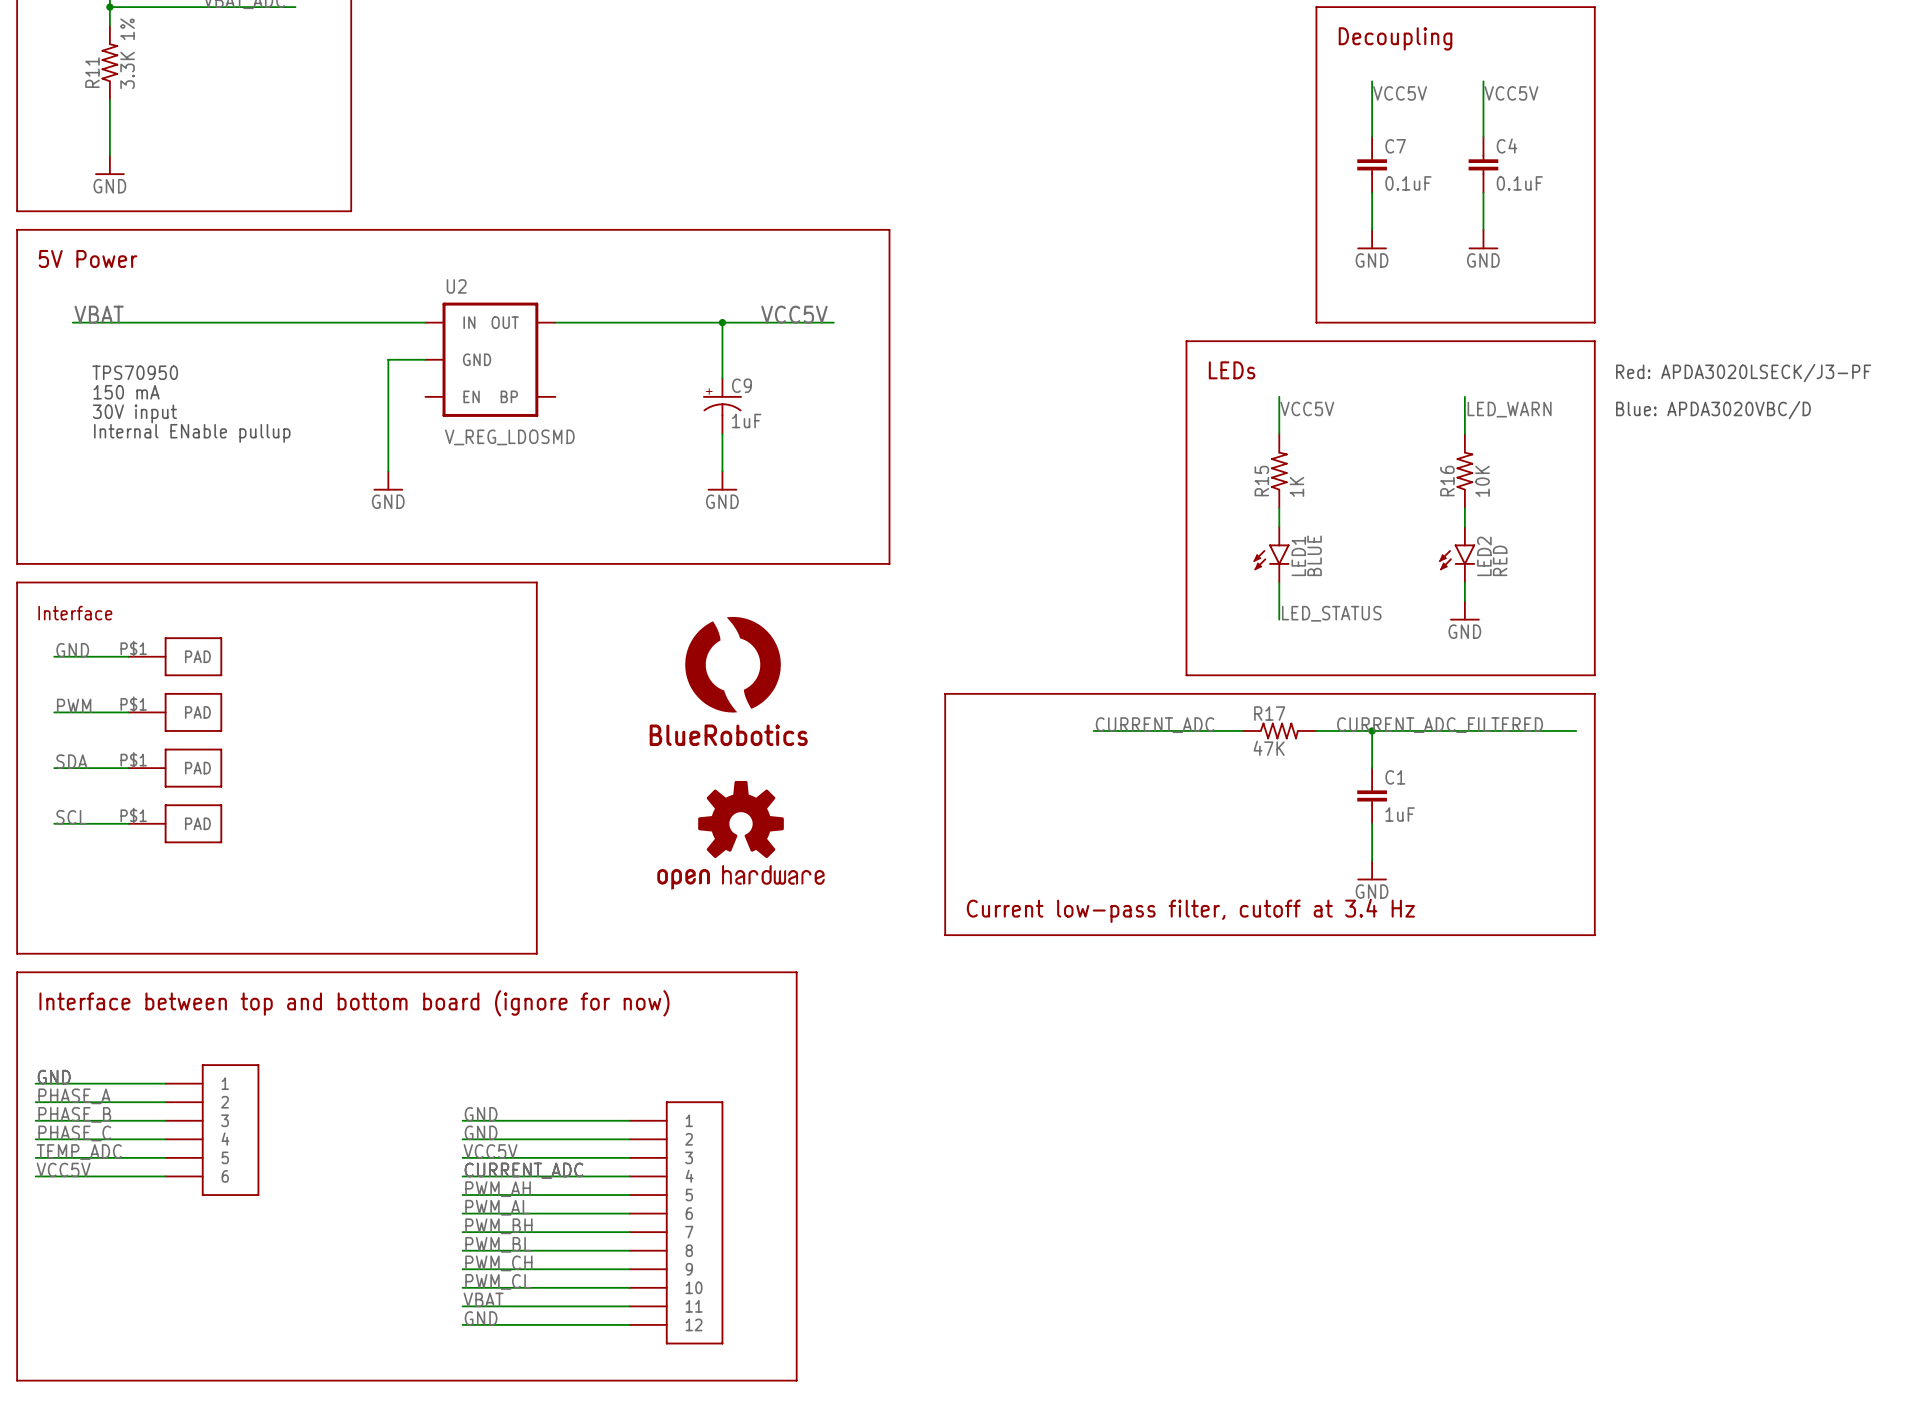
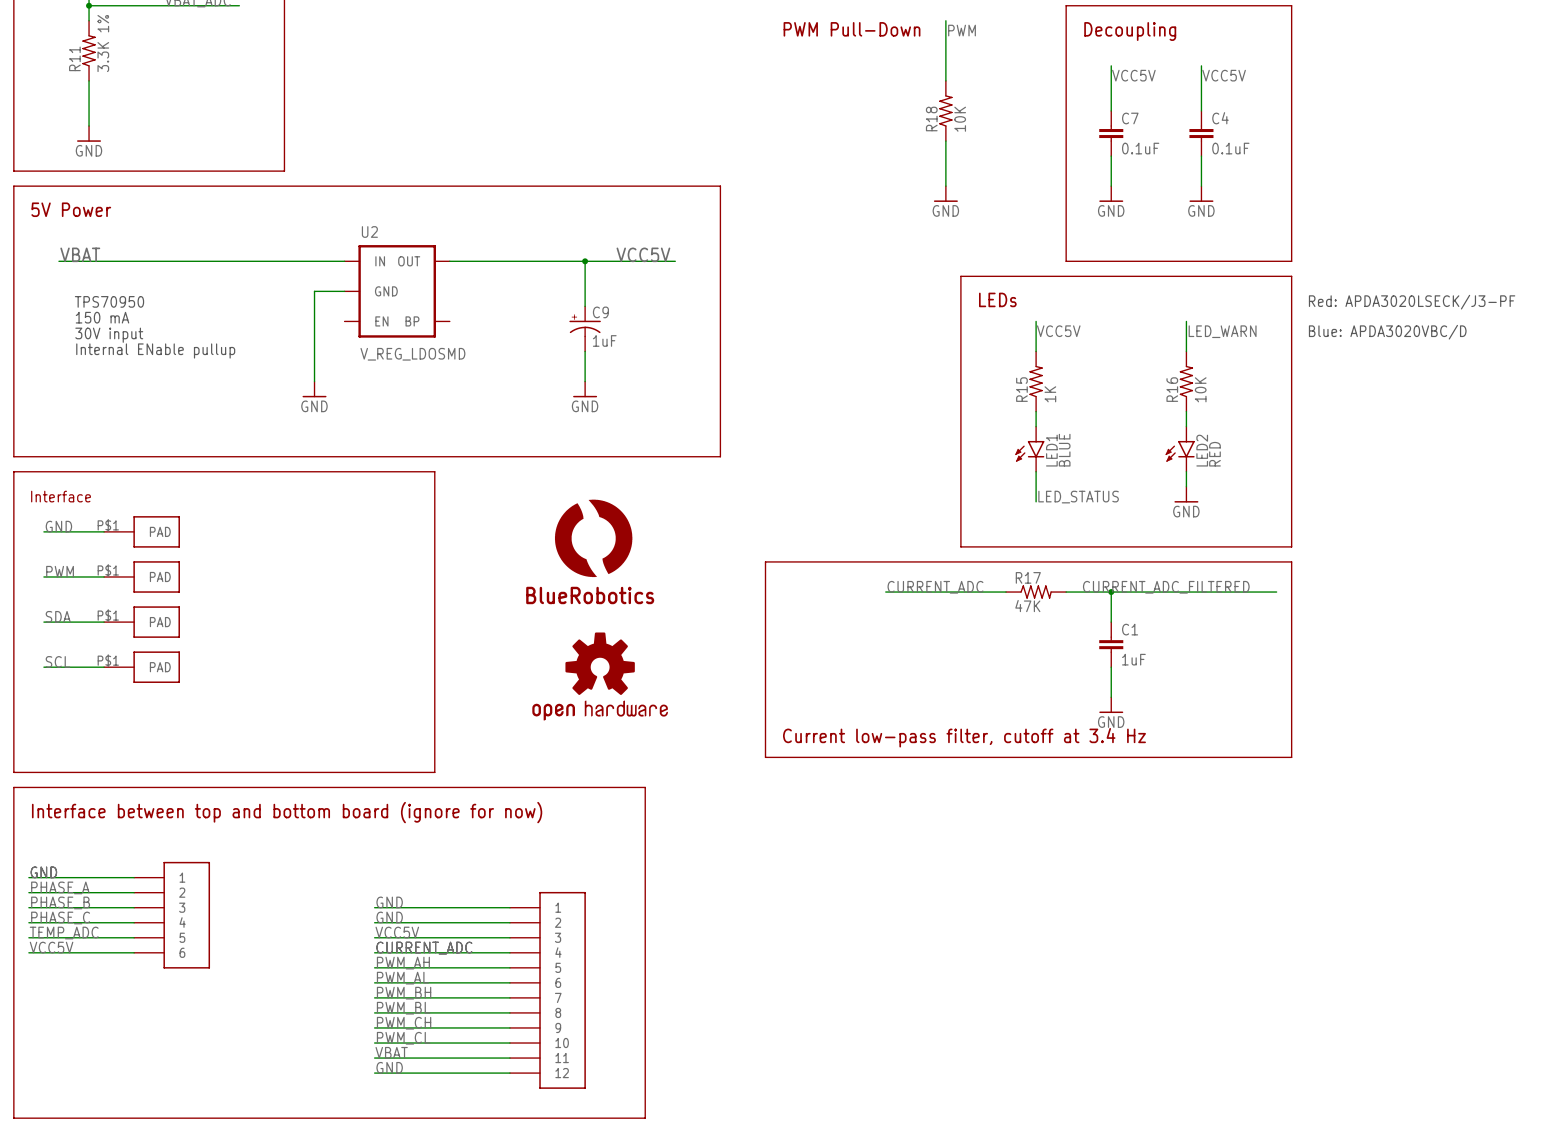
wire: none -> (945, 20) (945, 80)
text: none -> PWM Pull-Down (852, 29)
label: none -> PWM (962, 30)
R18: none -> 10K (945, 110)
wire: none -> (945, 141) (945, 186)
power symbol: none -> GND (945, 194)

